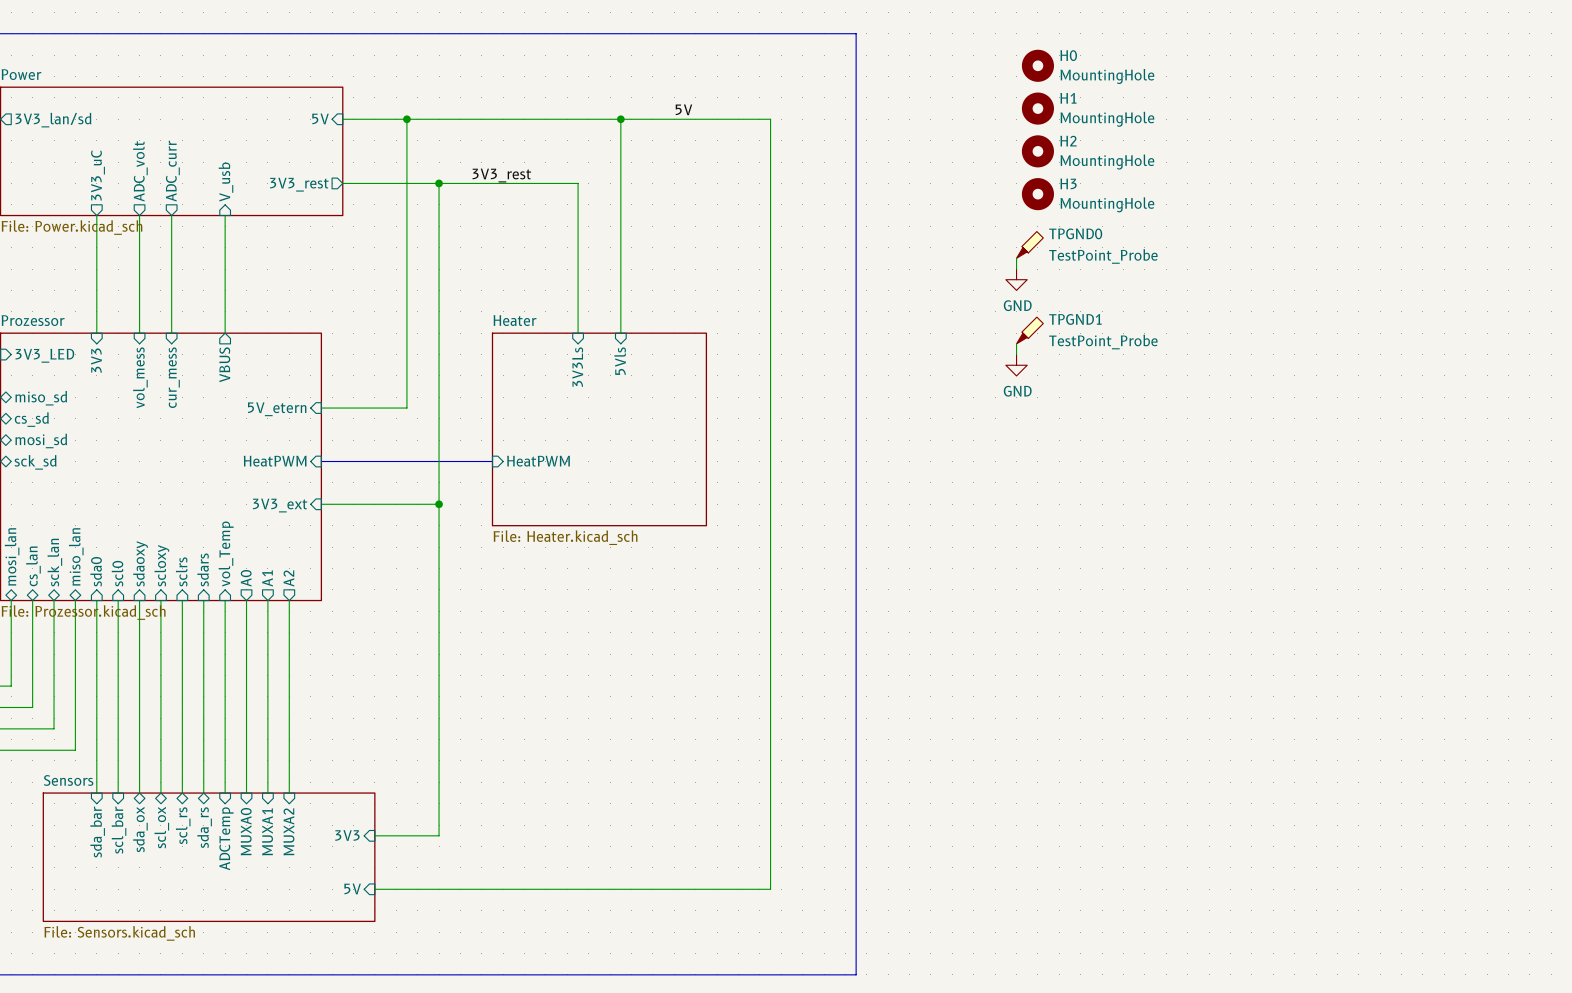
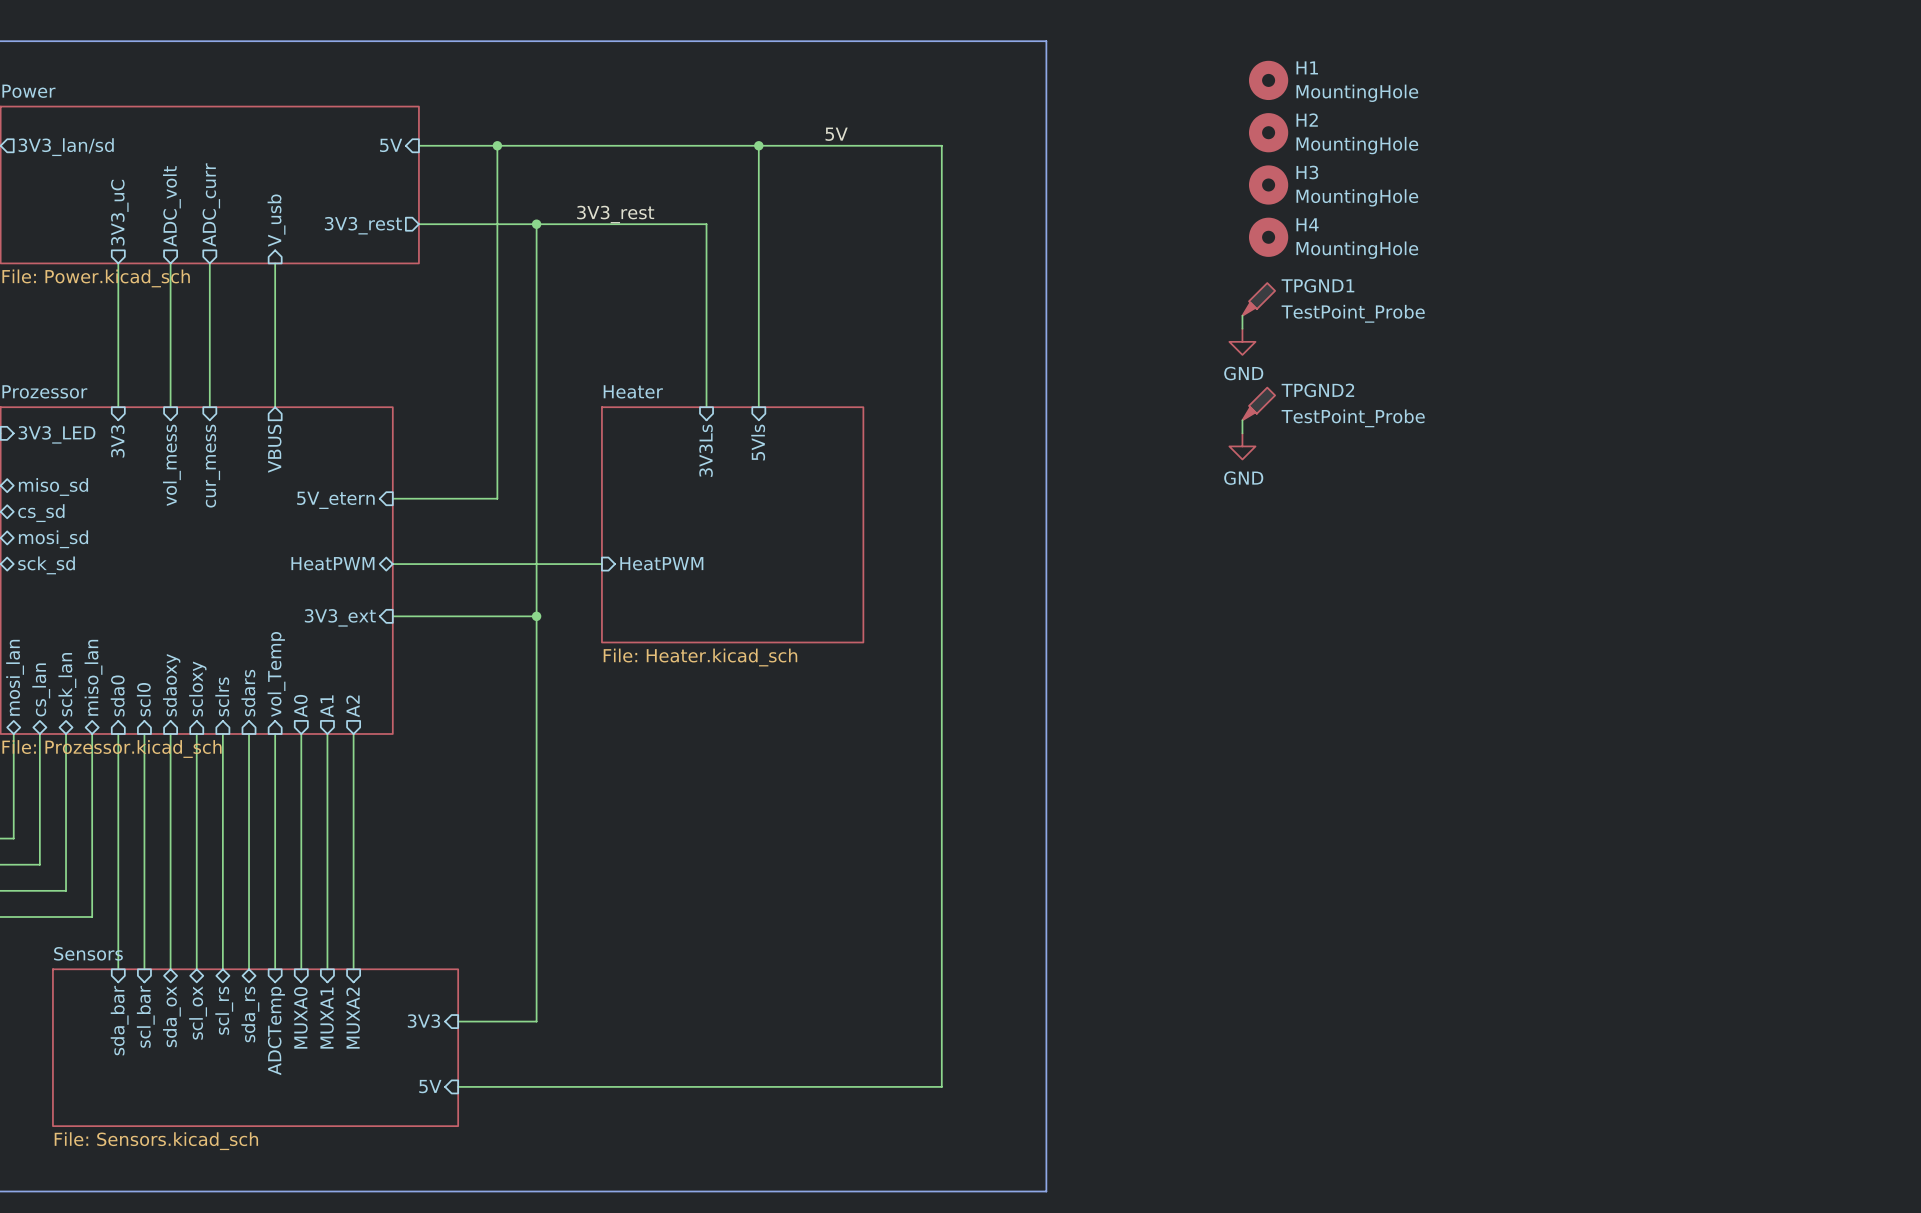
H0 name: H0 (1068, 55) -> H1 (1307, 67)
H1 name: H1 (1068, 98) -> H2 (1307, 120)
H2 name: H2 (1068, 141) -> H3 (1307, 172)
H3 name: H3 (1068, 183) -> H4 (1307, 224)
TPGND0 name: TPGND0 (1075, 233) -> TPGND1 (1317, 285)
TPGND1 name: TPGND1 (1075, 319) -> TPGND2 (1317, 390)
sheet pin shape: input (275, 461) -> bidirectional (332, 563)
bus: (321, 461) (492, 461) -> none

